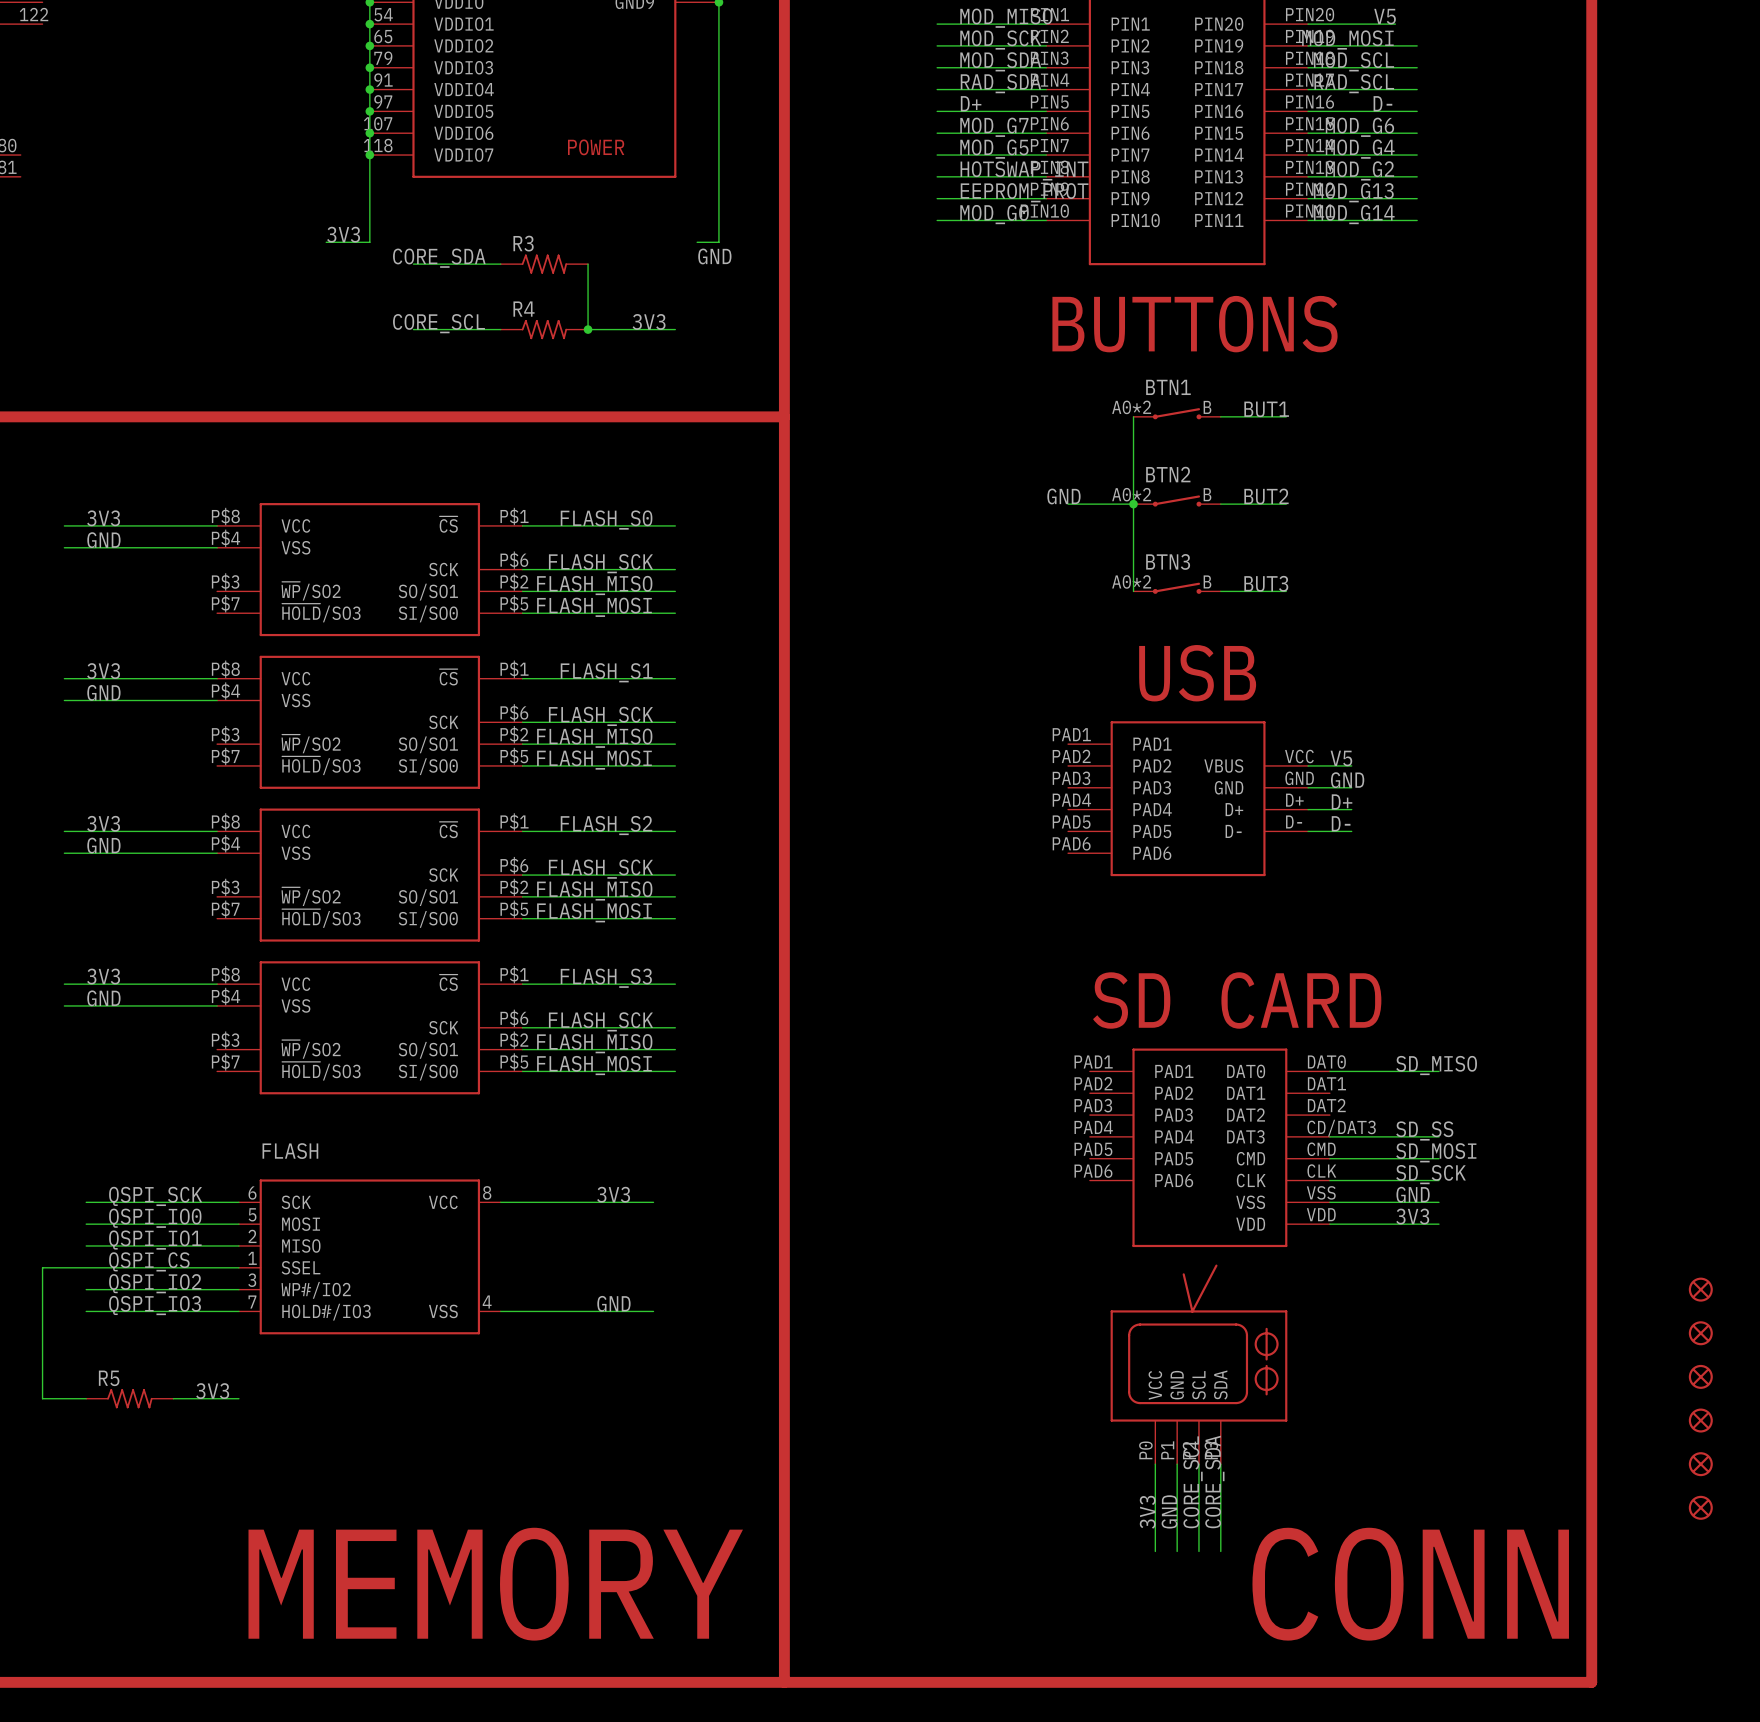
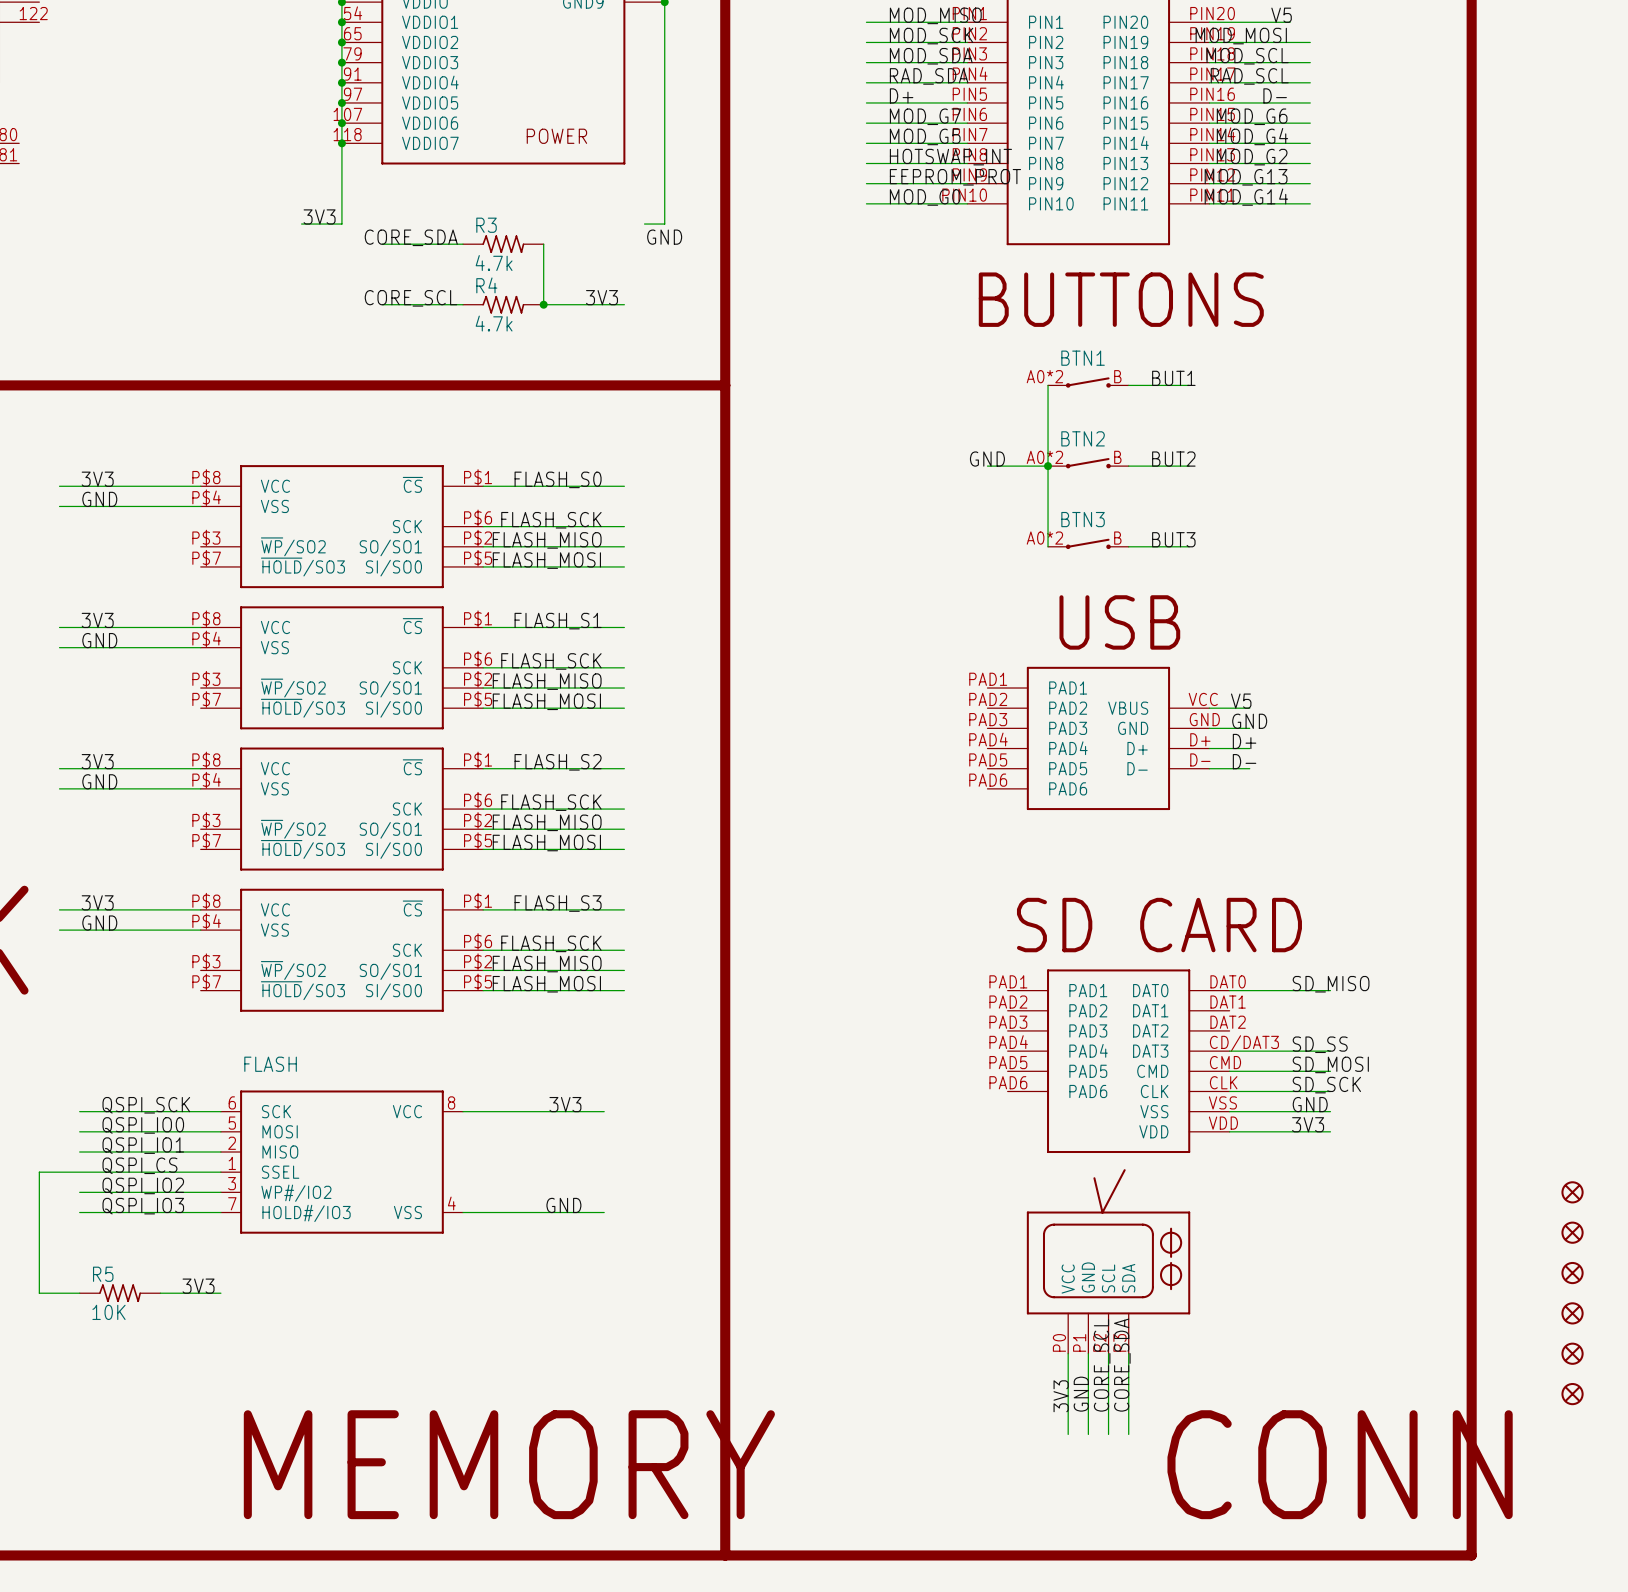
R3 value: none -> 4.7k (494, 263)
R4 value: none -> 4.7k (494, 323)
R5 value: none -> 10K (108, 1312)

